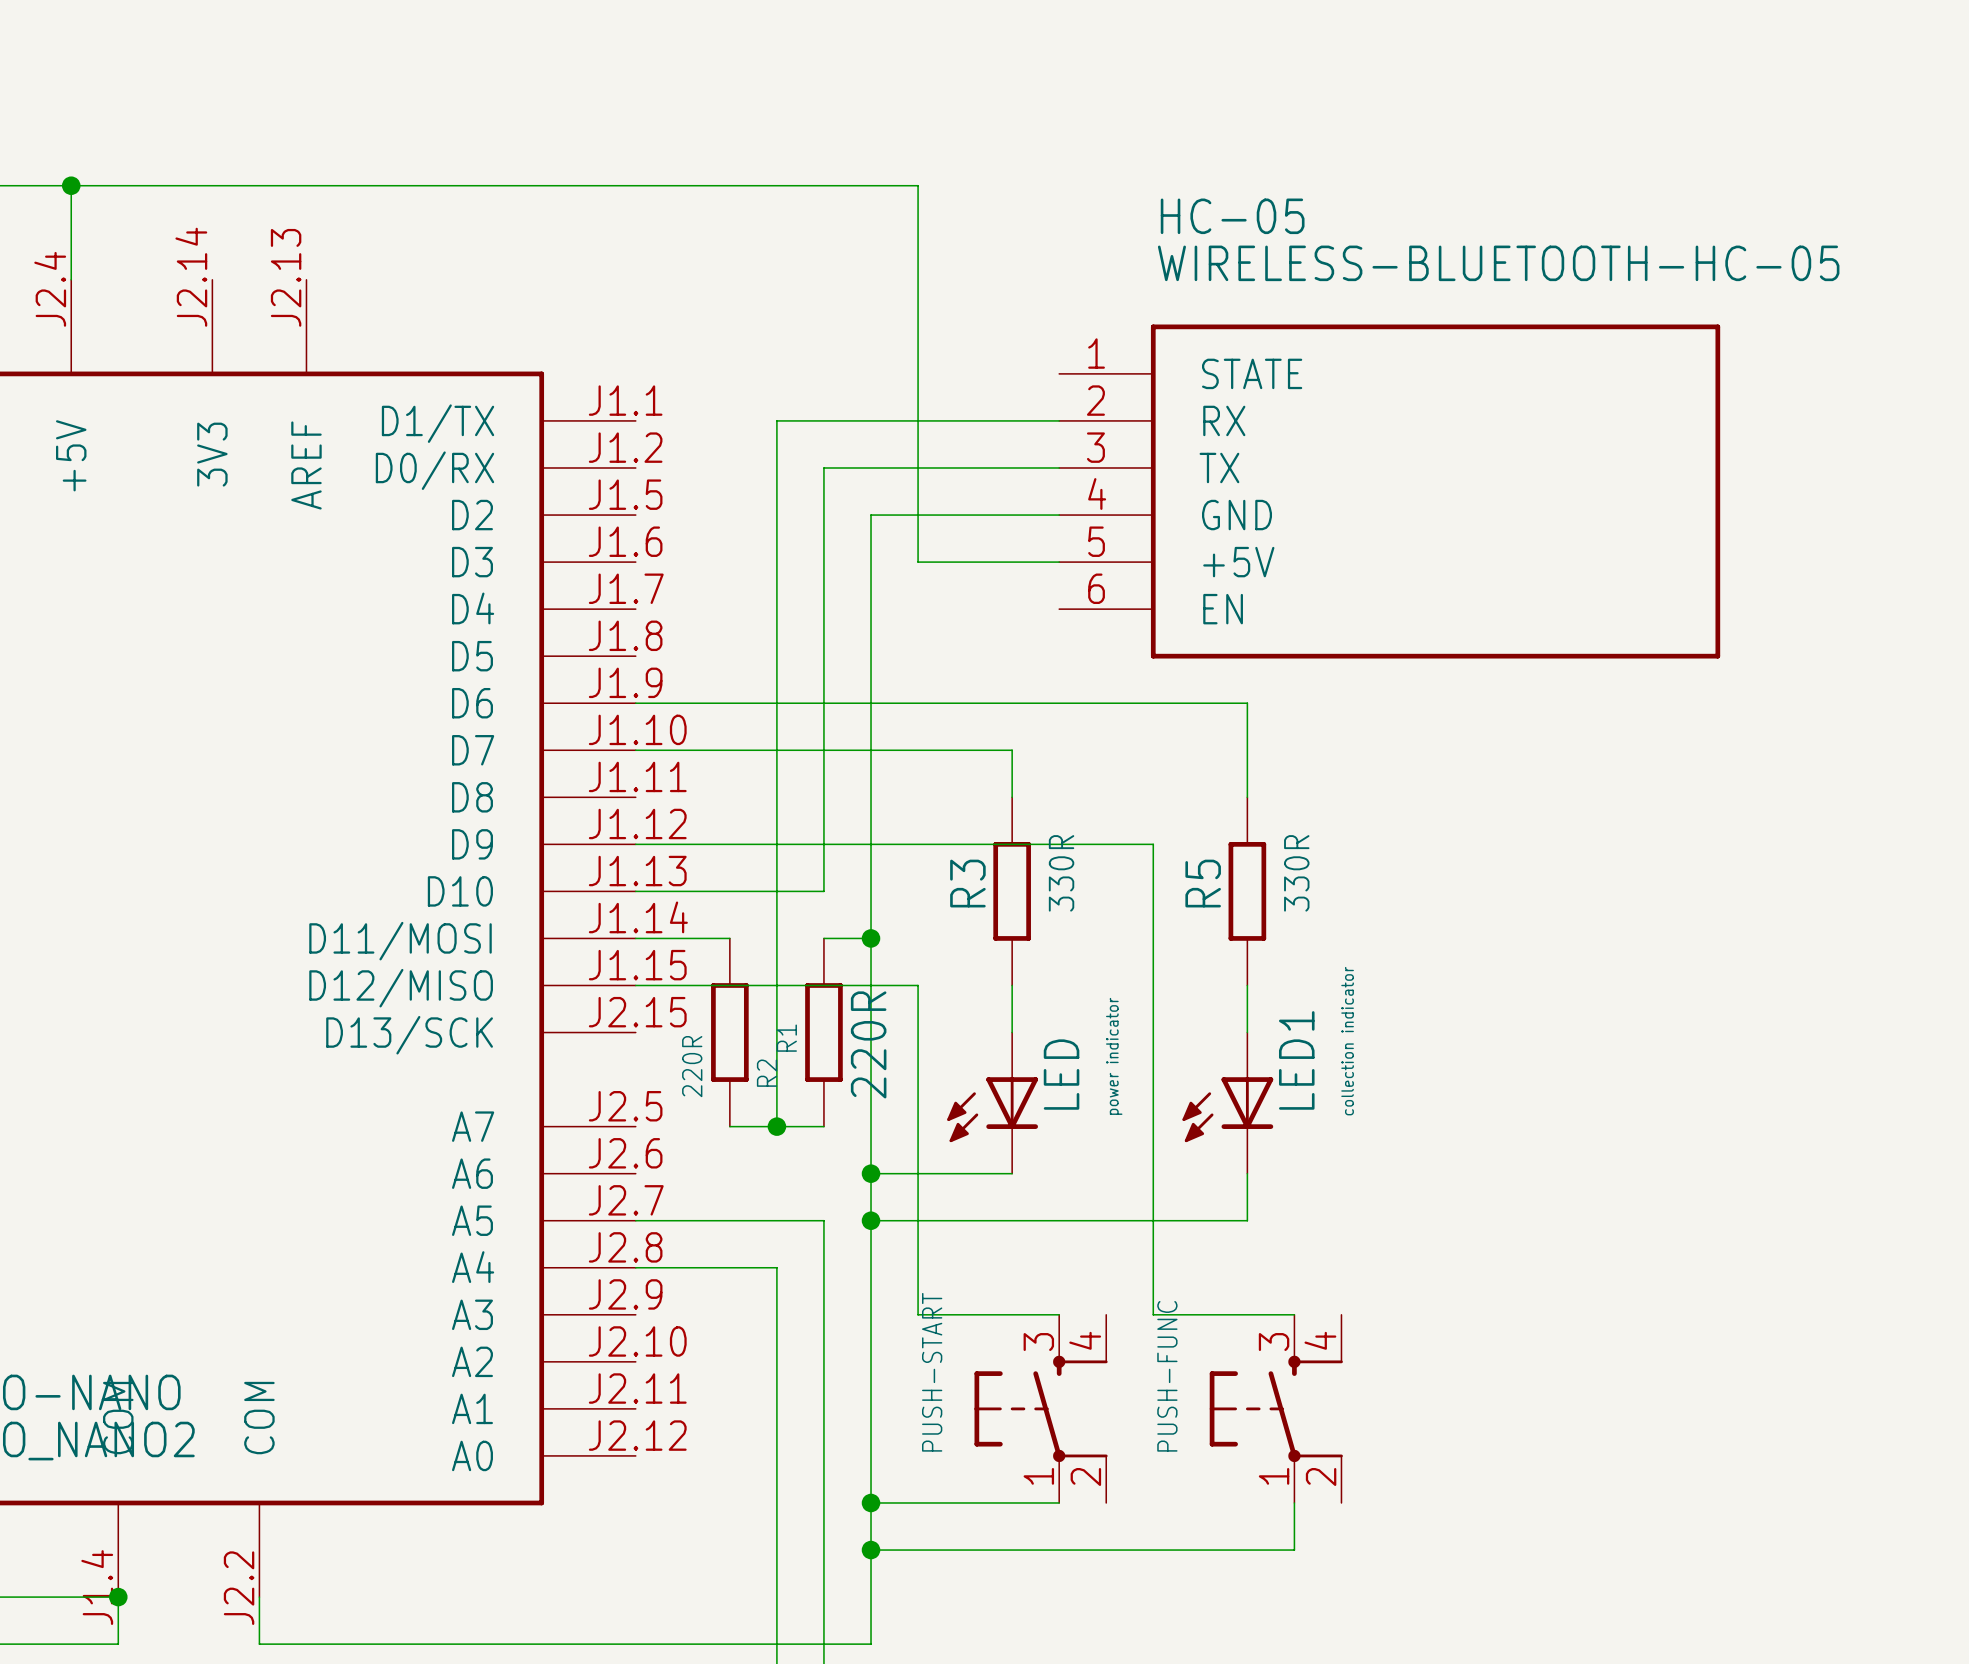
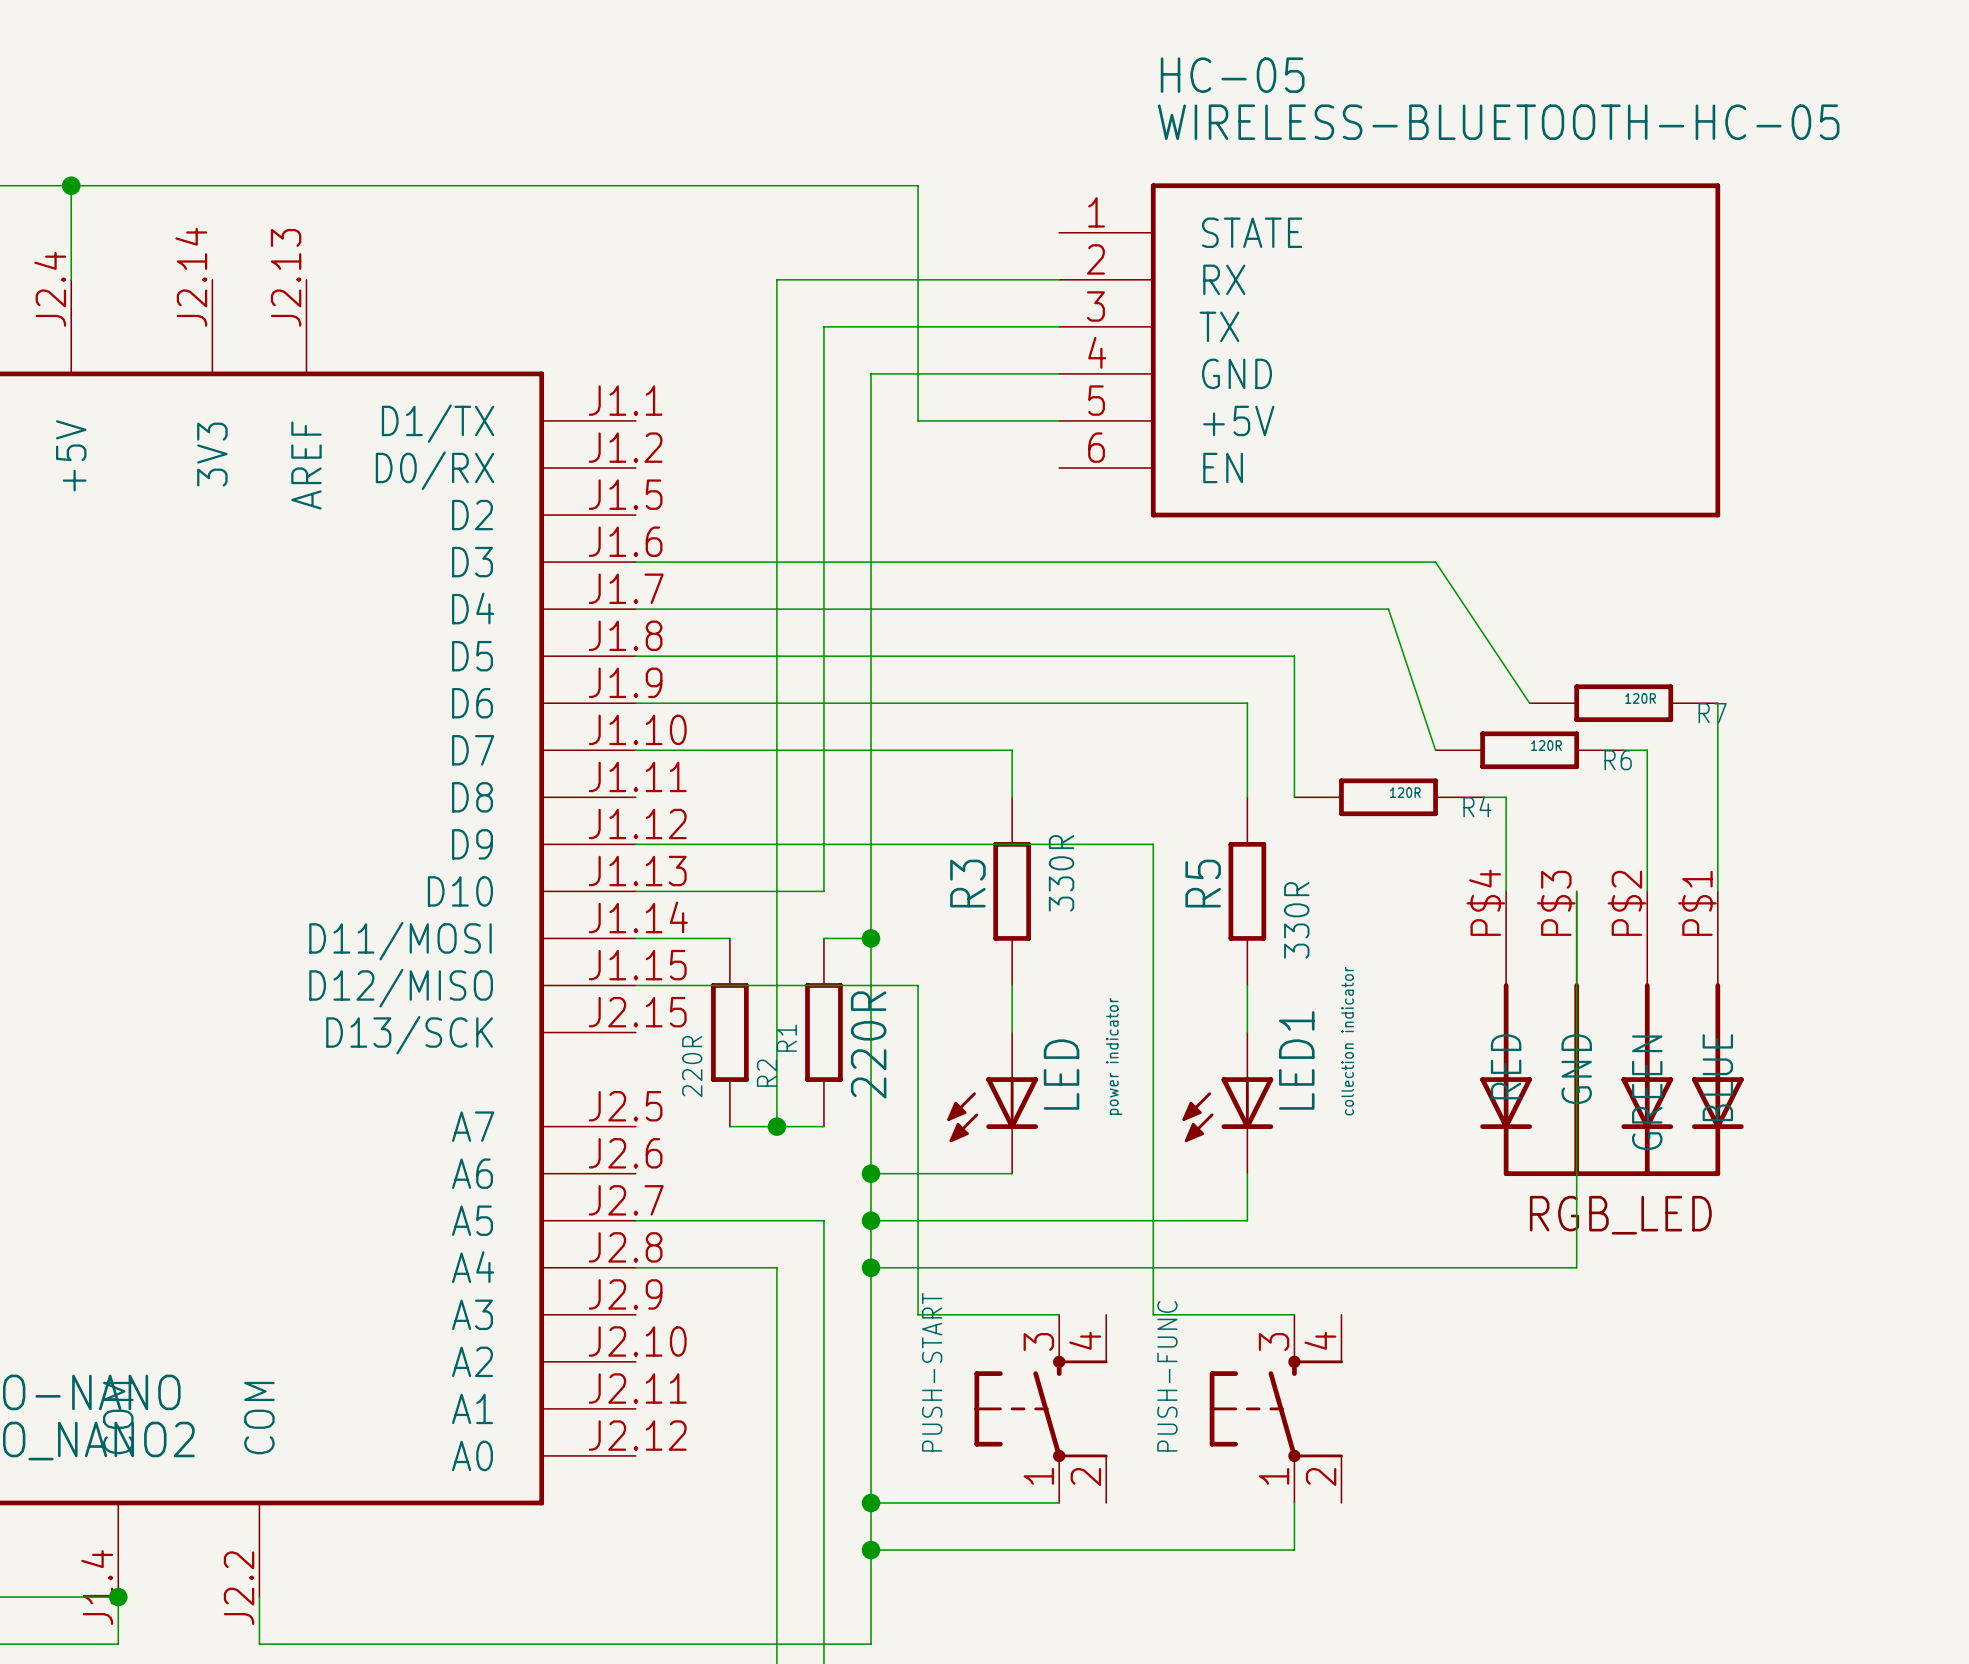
wire: none -> (1059, 279) (776, 279) (776, 420)
wire: (776, 420) (918, 420) (918, 562) -> (635, 562) (918, 562)
wire: (823, 467) (1059, 467) -> (823, 467) (823, 326) (1059, 326)
HC-05 position: (1389, 491) -> (1389, 350)
wire: (871, 515) (1059, 515) -> (871, 515) (871, 373) (1059, 373)
wire: none -> (1059, 562) (1435, 562) (1529, 703)
wire: none -> (635, 609) (1388, 609) (1435, 750)
wire: none -> (635, 656) (1294, 656) (1294, 797)
R7: none -> 120R (1623, 703)
wire: none -> (1717, 703) (1717, 891)
R6: none -> 120R (1529, 750)
wire: none -> (1623, 750) (1647, 750) (1647, 891)
R4: none -> 120R (1388, 797)
wire: none -> (1482, 797) (1506, 797) (1506, 891)
R5 value position: 330R (1296, 873) -> 330R (1296, 920)
wire: none -> (1576, 891) (1576, 1267) (871, 1267)
RGB_LED: none -> (1611, 1033)
junction: none -> (871, 1267)

